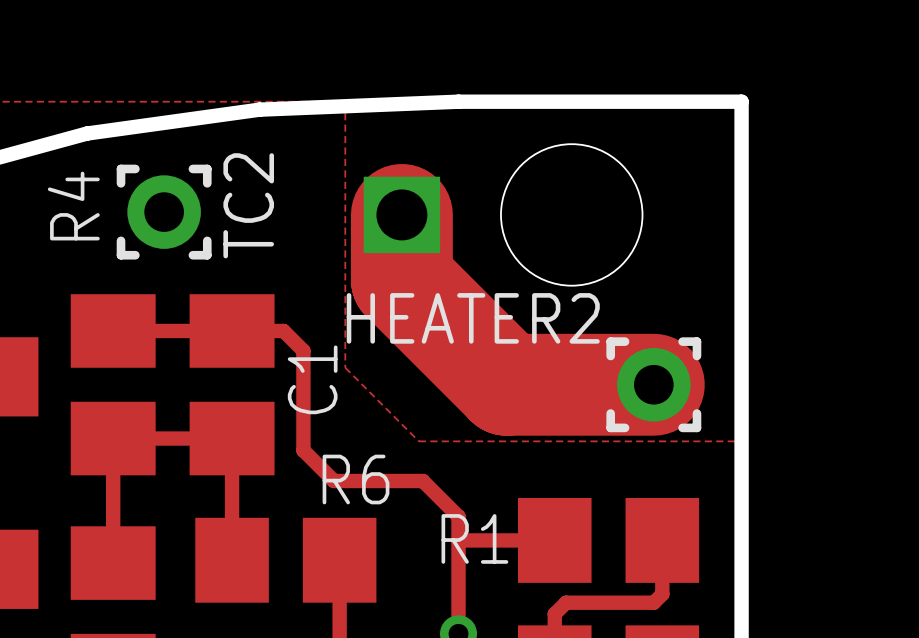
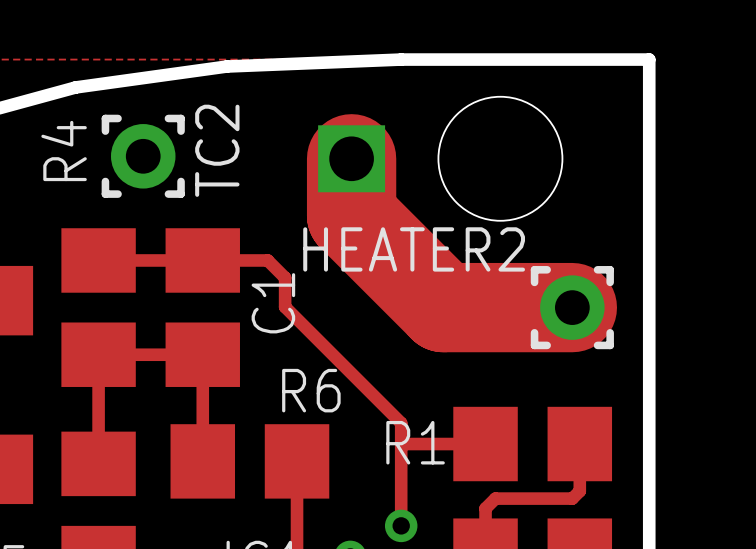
zone outline: (345, 101) (345, 367) (418, 441) (741, 441) -> none
track: (283, 330) (303, 350) (303, 450) (333, 481) (422, 481) -> (247, 260) (267, 260) (285, 277) (285, 307) (370, 391)

